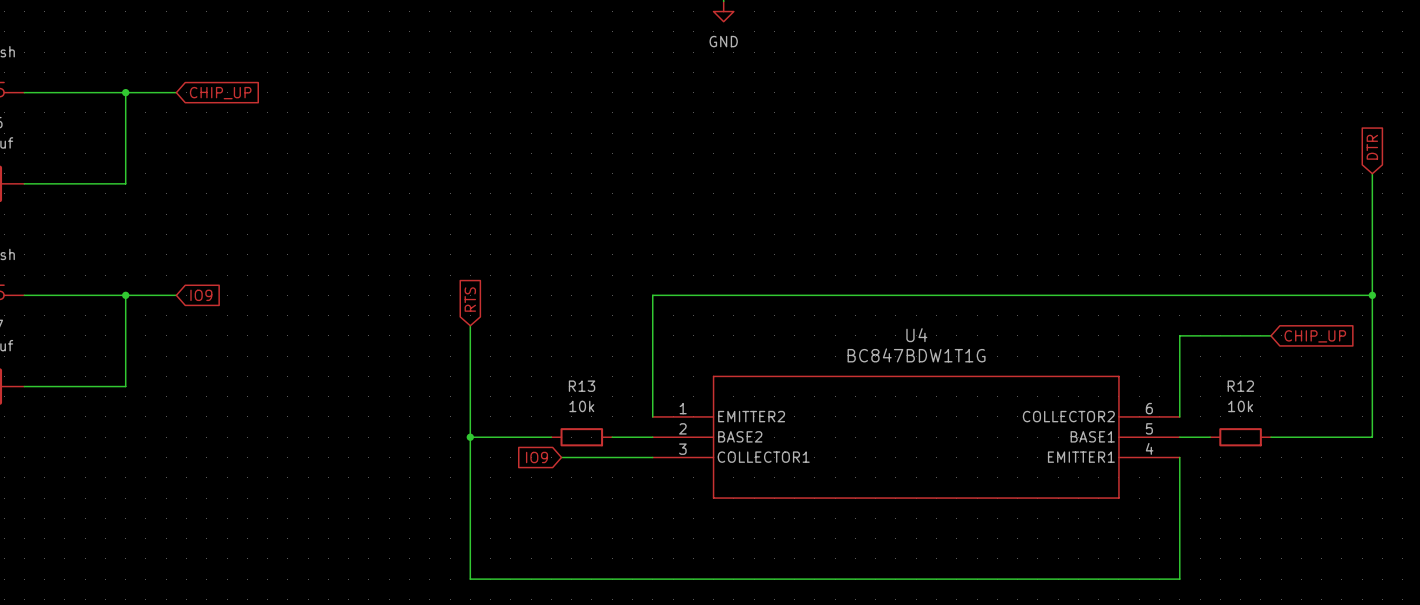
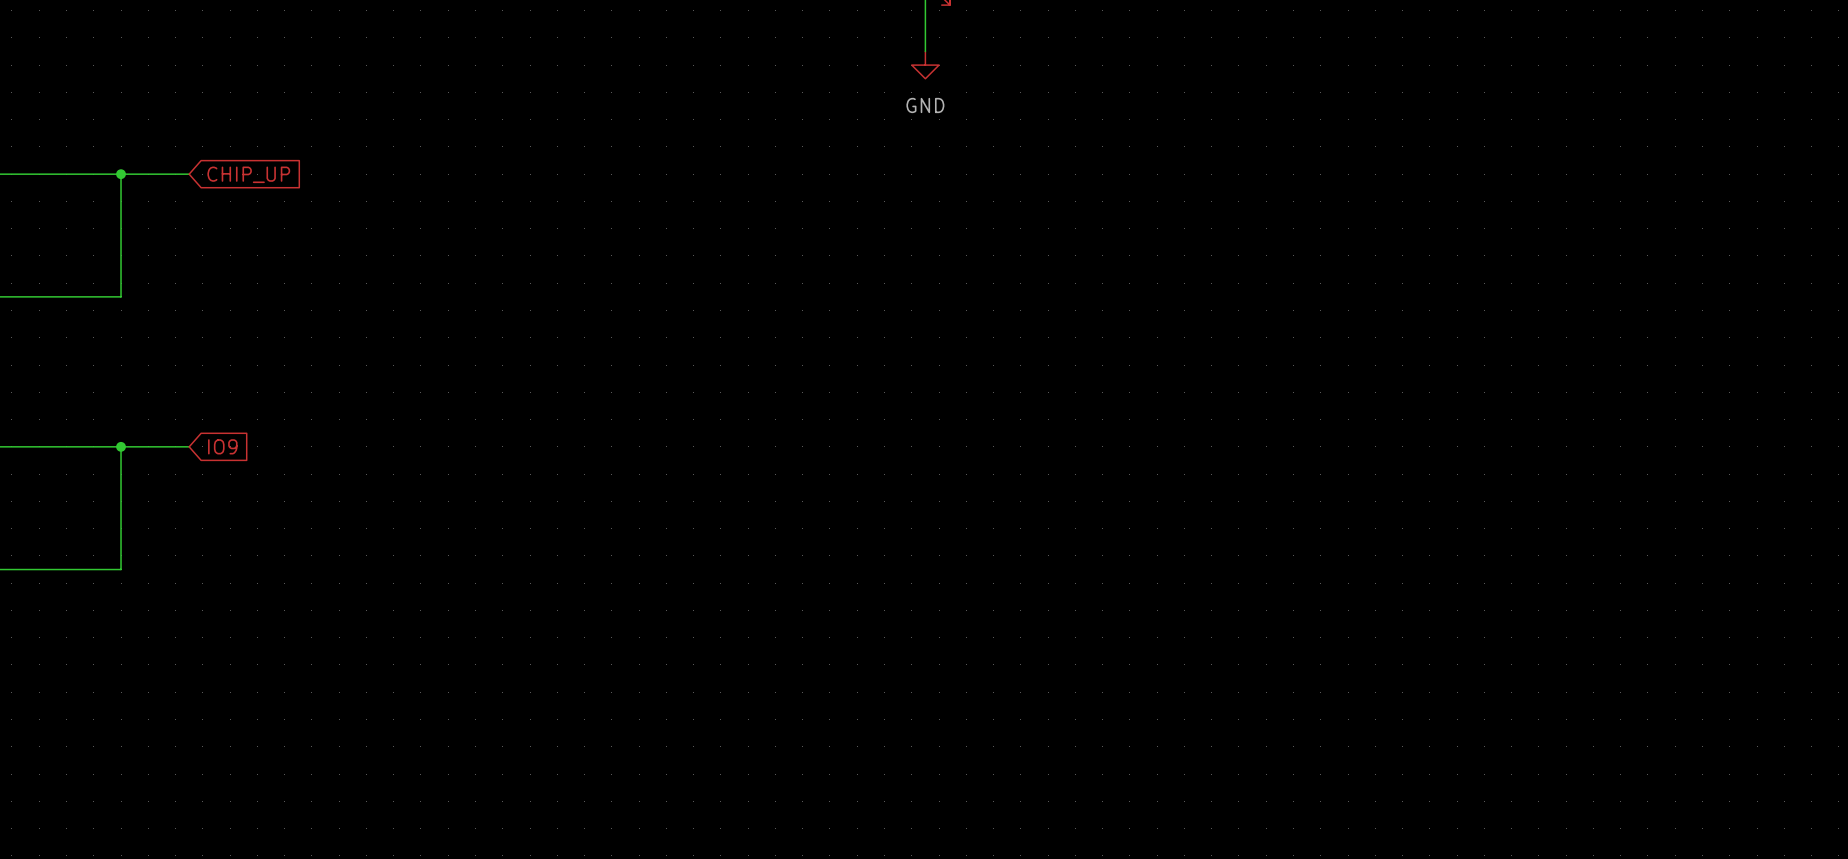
global label: DTR (1372, 147) -> none
wire: (1372, 173) (1372, 437) (1270, 437) -> none
wire: (1372, 295) (652, 295) (652, 416) -> none
junction: (1372, 295) -> none
global label: RTS (470, 299) -> none
wire: (470, 325) (470, 579) (1179, 579) (1179, 457) -> none
wire: (1270, 335) (1179, 335) (1179, 416) -> none
global label: CHIP_UP (1315, 336) -> none
wire: (470, 437) (551, 437) -> none
junction: (470, 437) -> none
R13: 10k (581, 437) -> none
wire: (612, 437) (652, 437) -> none
U4: BC847BDW1T1G (916, 437) -> none
wire: (1179, 437) (1210, 437) -> none
R12: 10k (1240, 437) -> none
global label: IO9 (537, 457) -> none
wire: (561, 457) (652, 457) -> none

